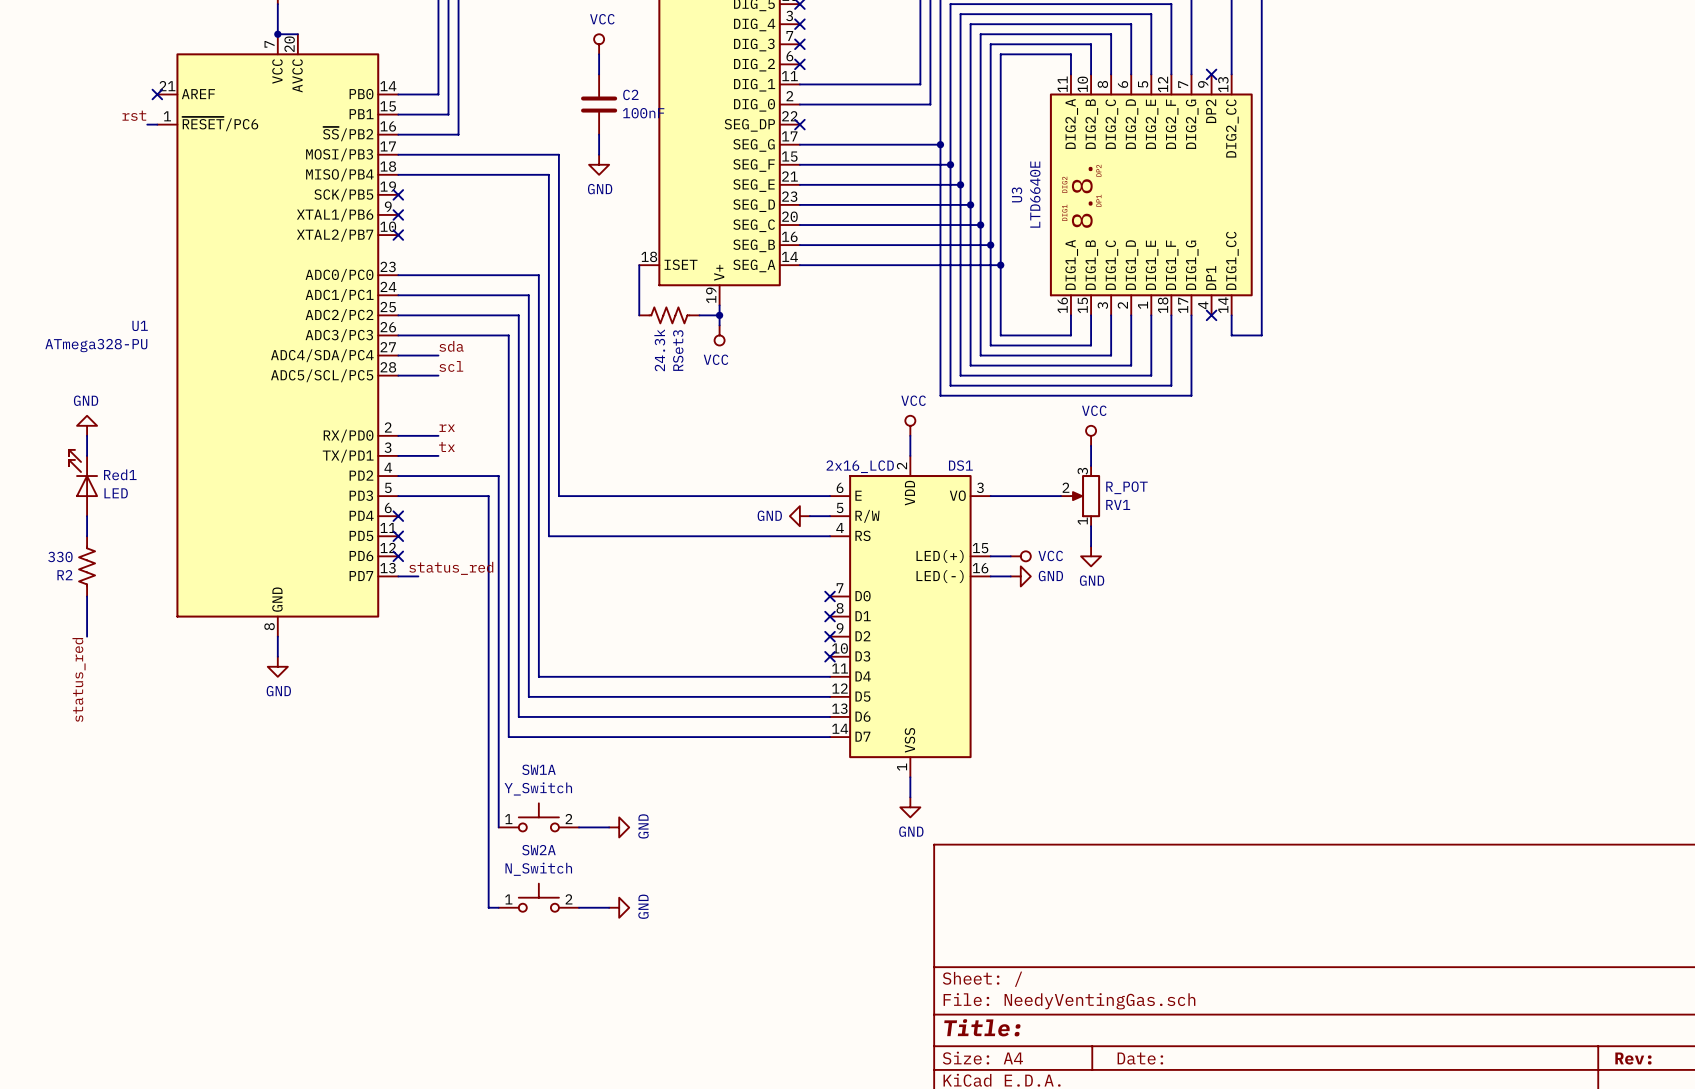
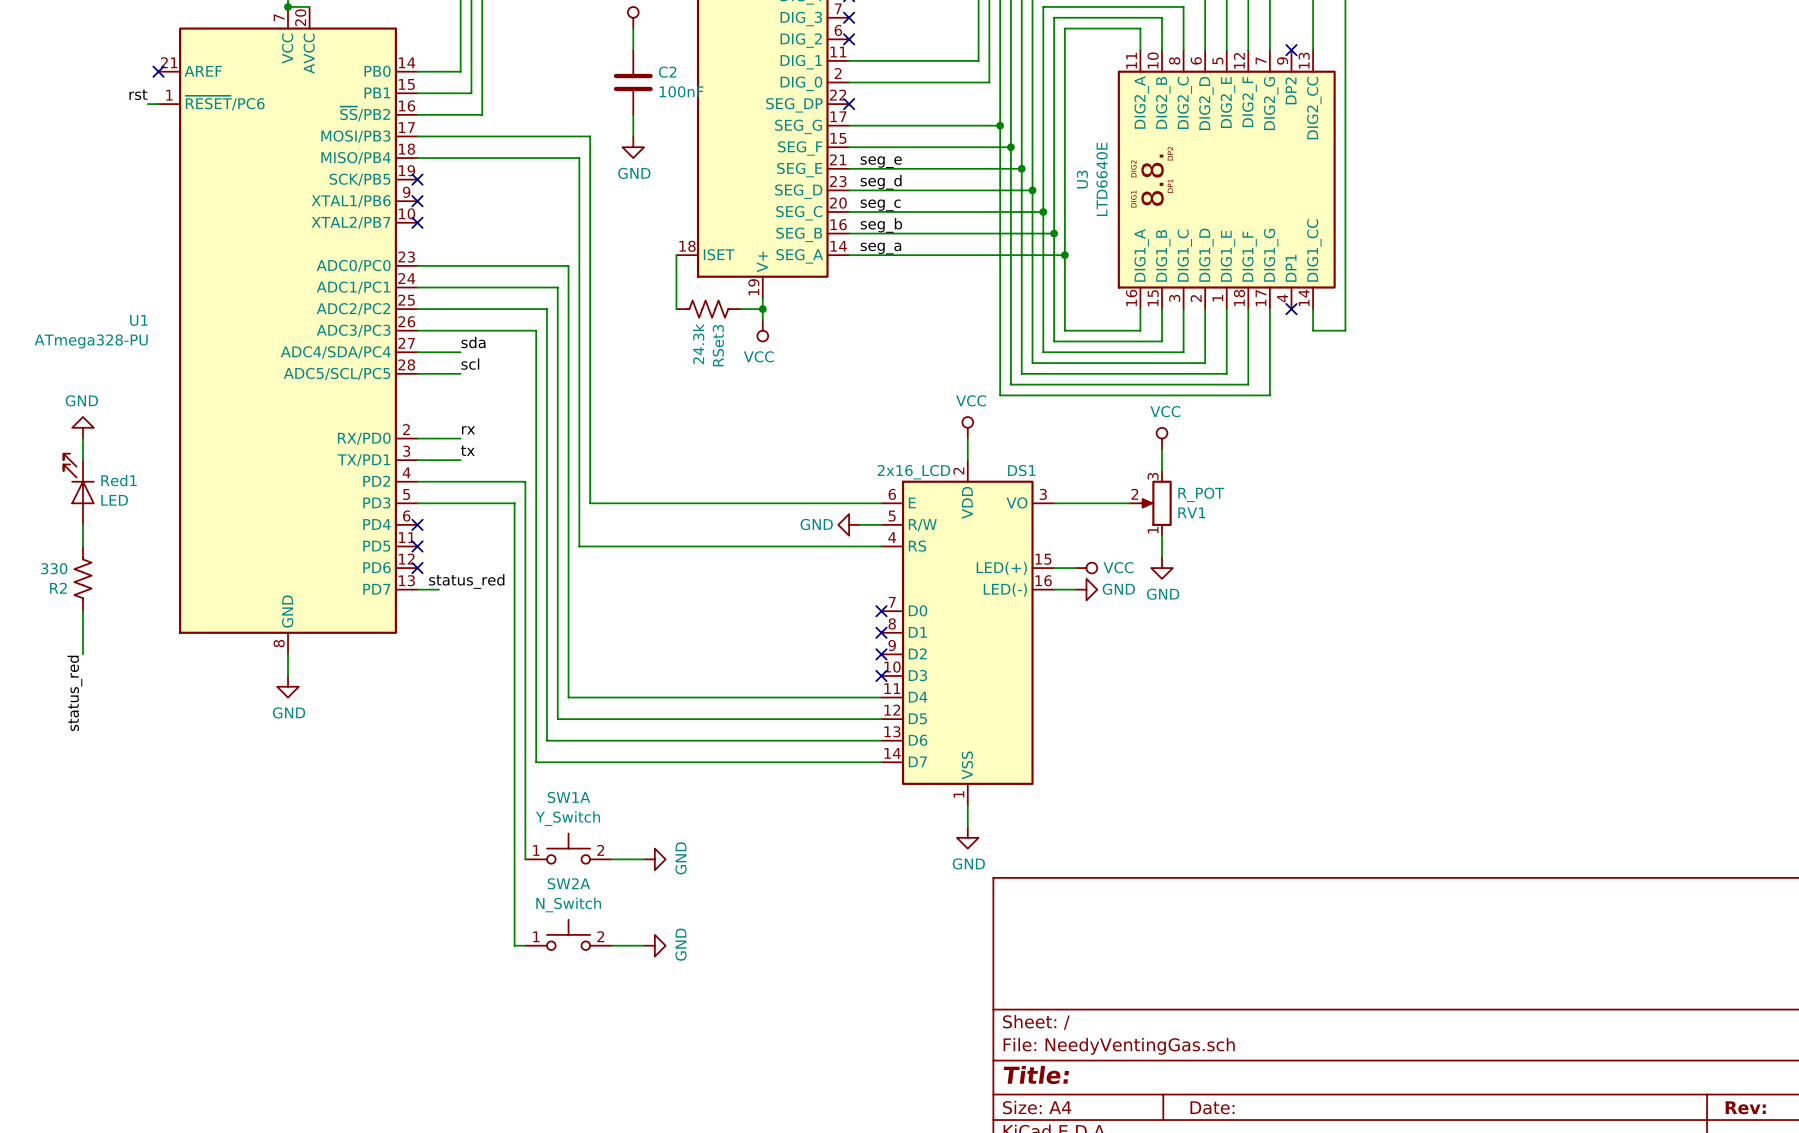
label: none -> seg_e (881, 162)
label: none -> seg_d (881, 182)
label: none -> seg_c (880, 205)
label: none -> seg_b (881, 225)
label: none -> seg_a (880, 248)

